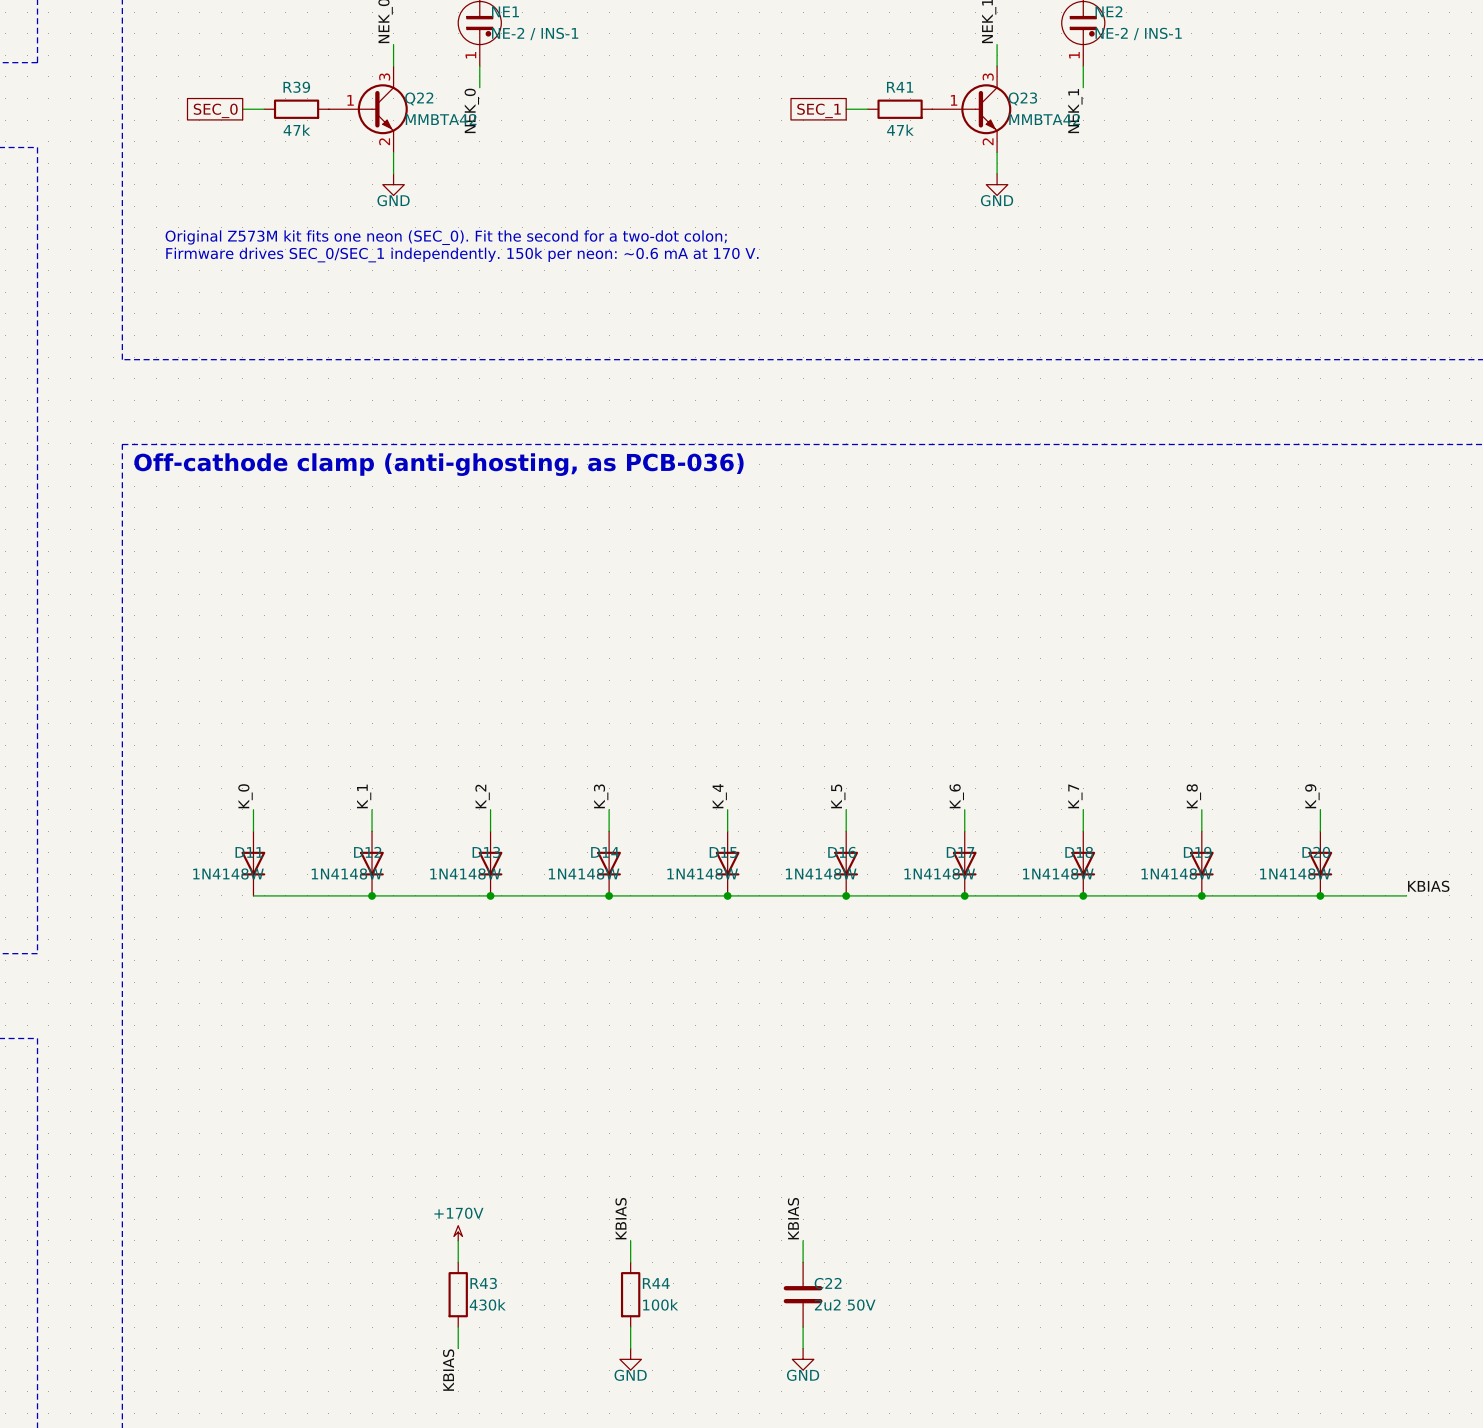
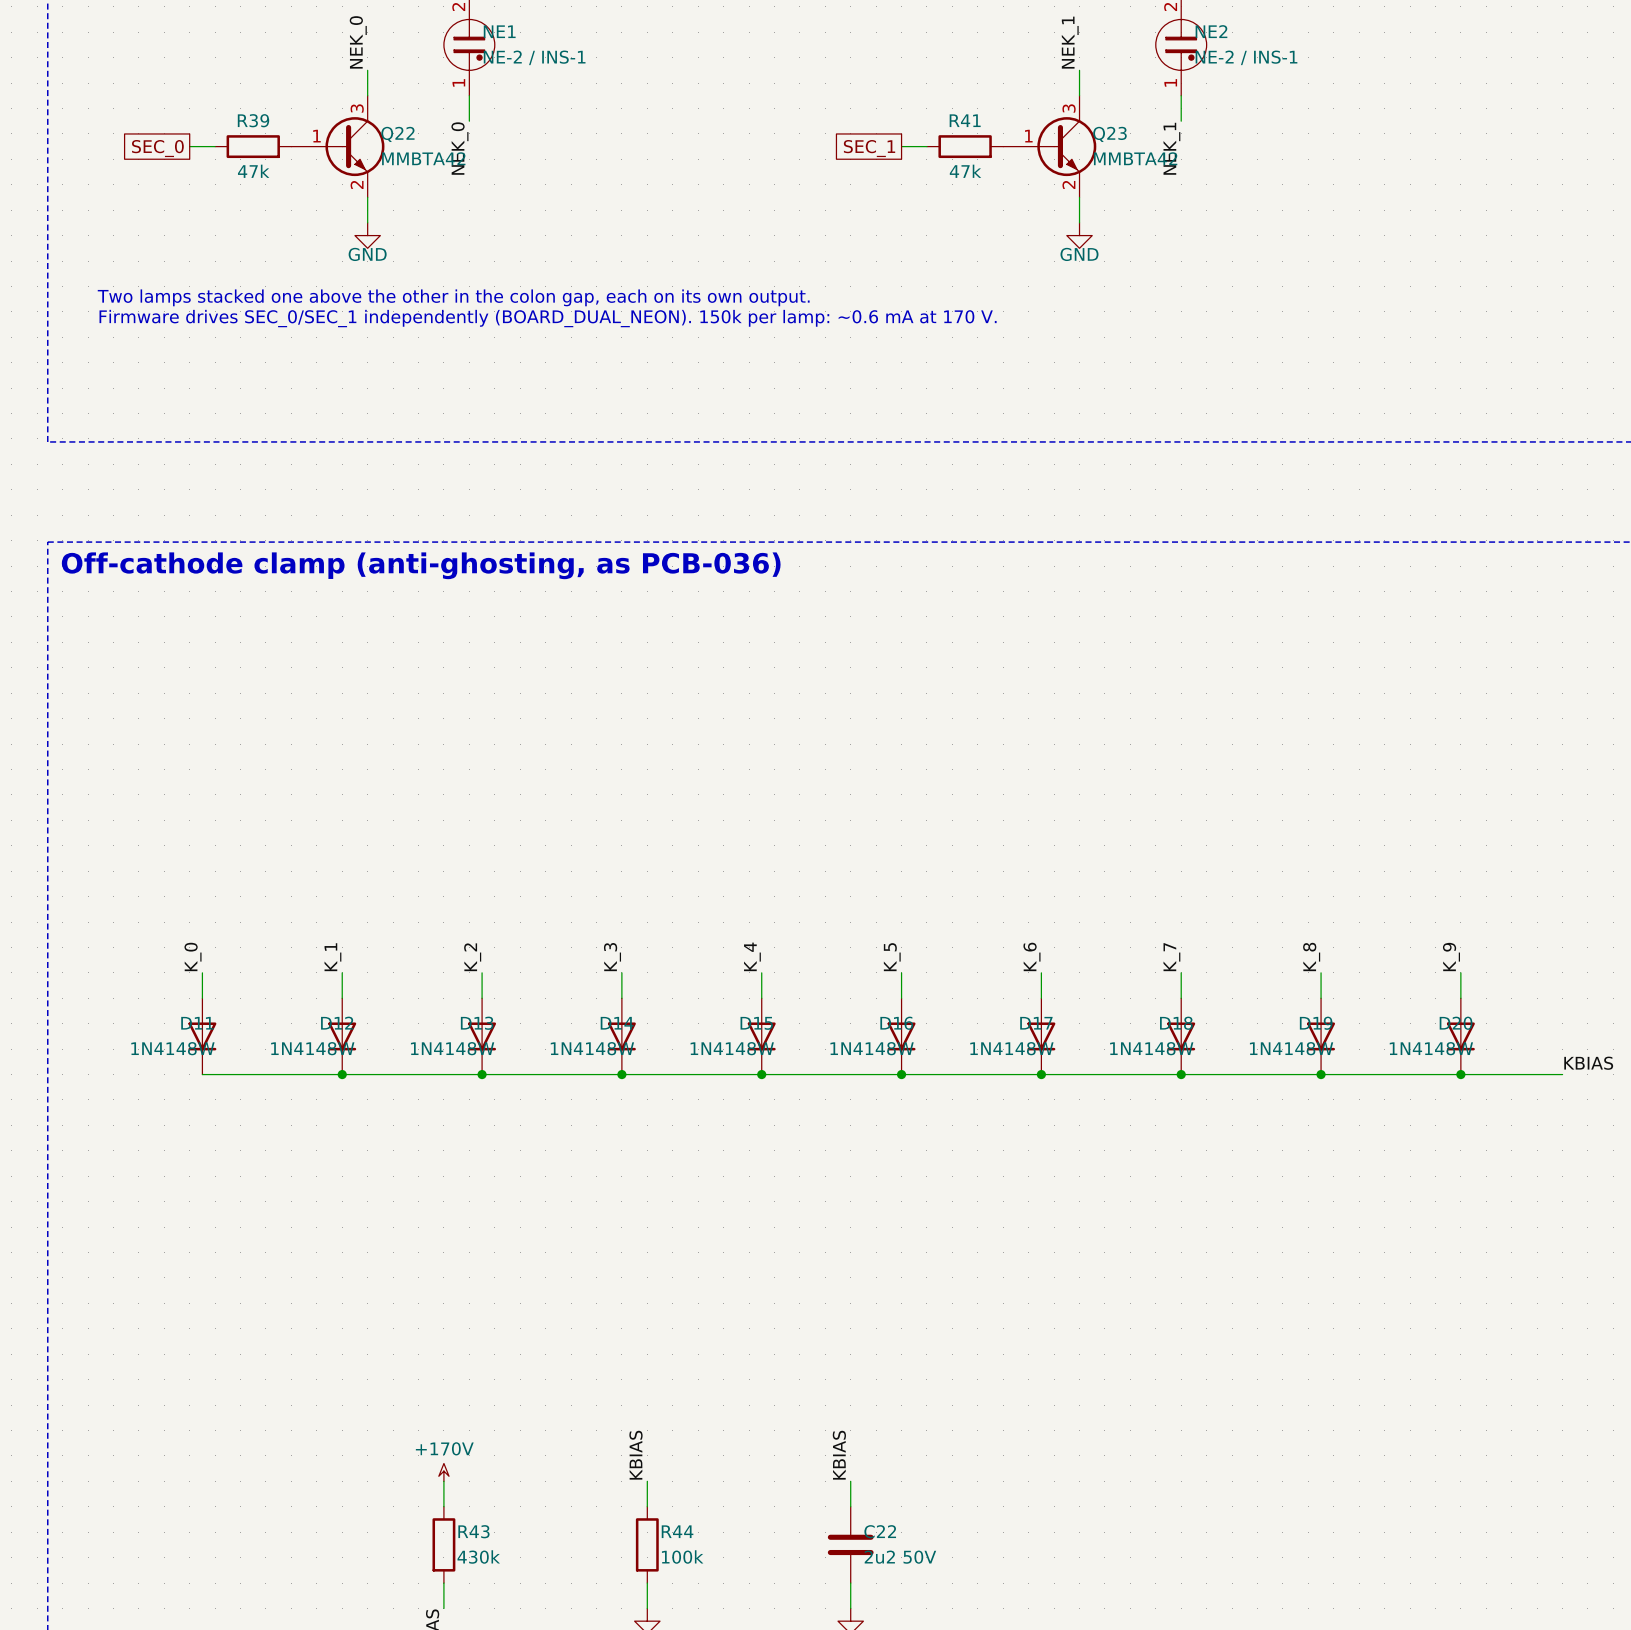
text: Original Z573M kit fits one neon (SEC_0). Fit the second for a two-dot colon; (446, 237) -> Two lamps stacked one above the other in the colon gap, each on its own output. (453, 297)
text: Firmware drives SEC_0/SEC_1 independently. 150k per neon: ~0.6 mA at 170 V. (462, 255) -> Firmware drives SEC_0/SEC_1 independently (BOARD_DUAL_NEON). 150k per lamp: ~0.6 mA at 170 V. (548, 318)

